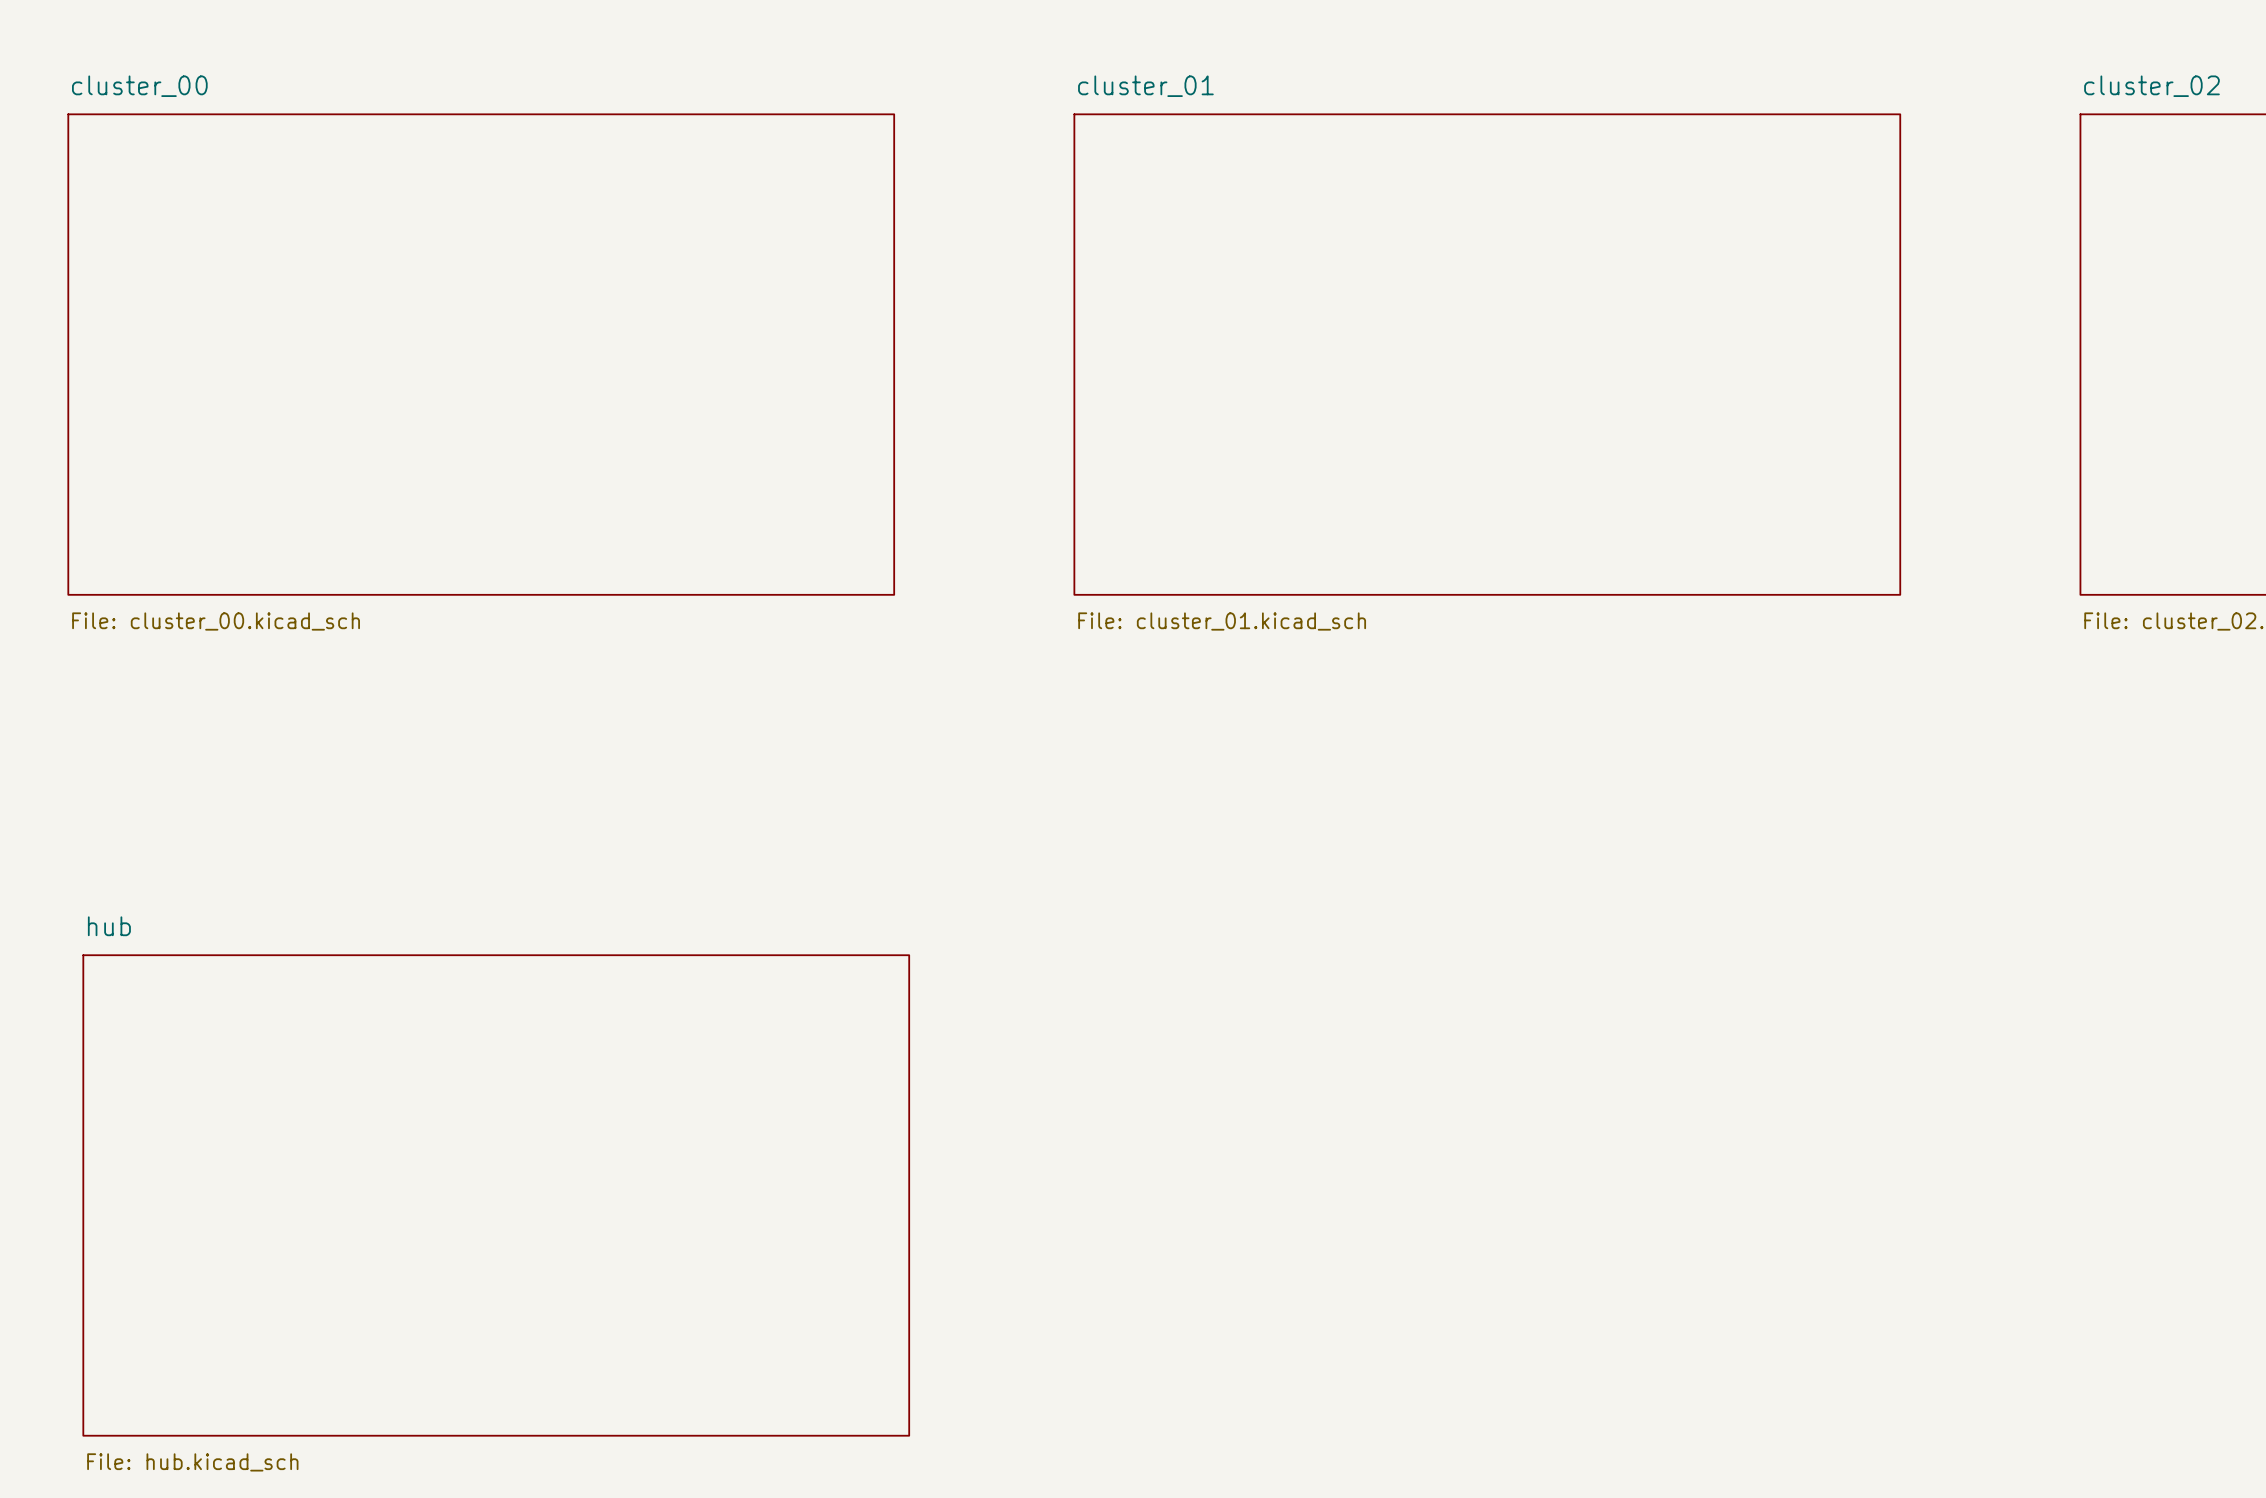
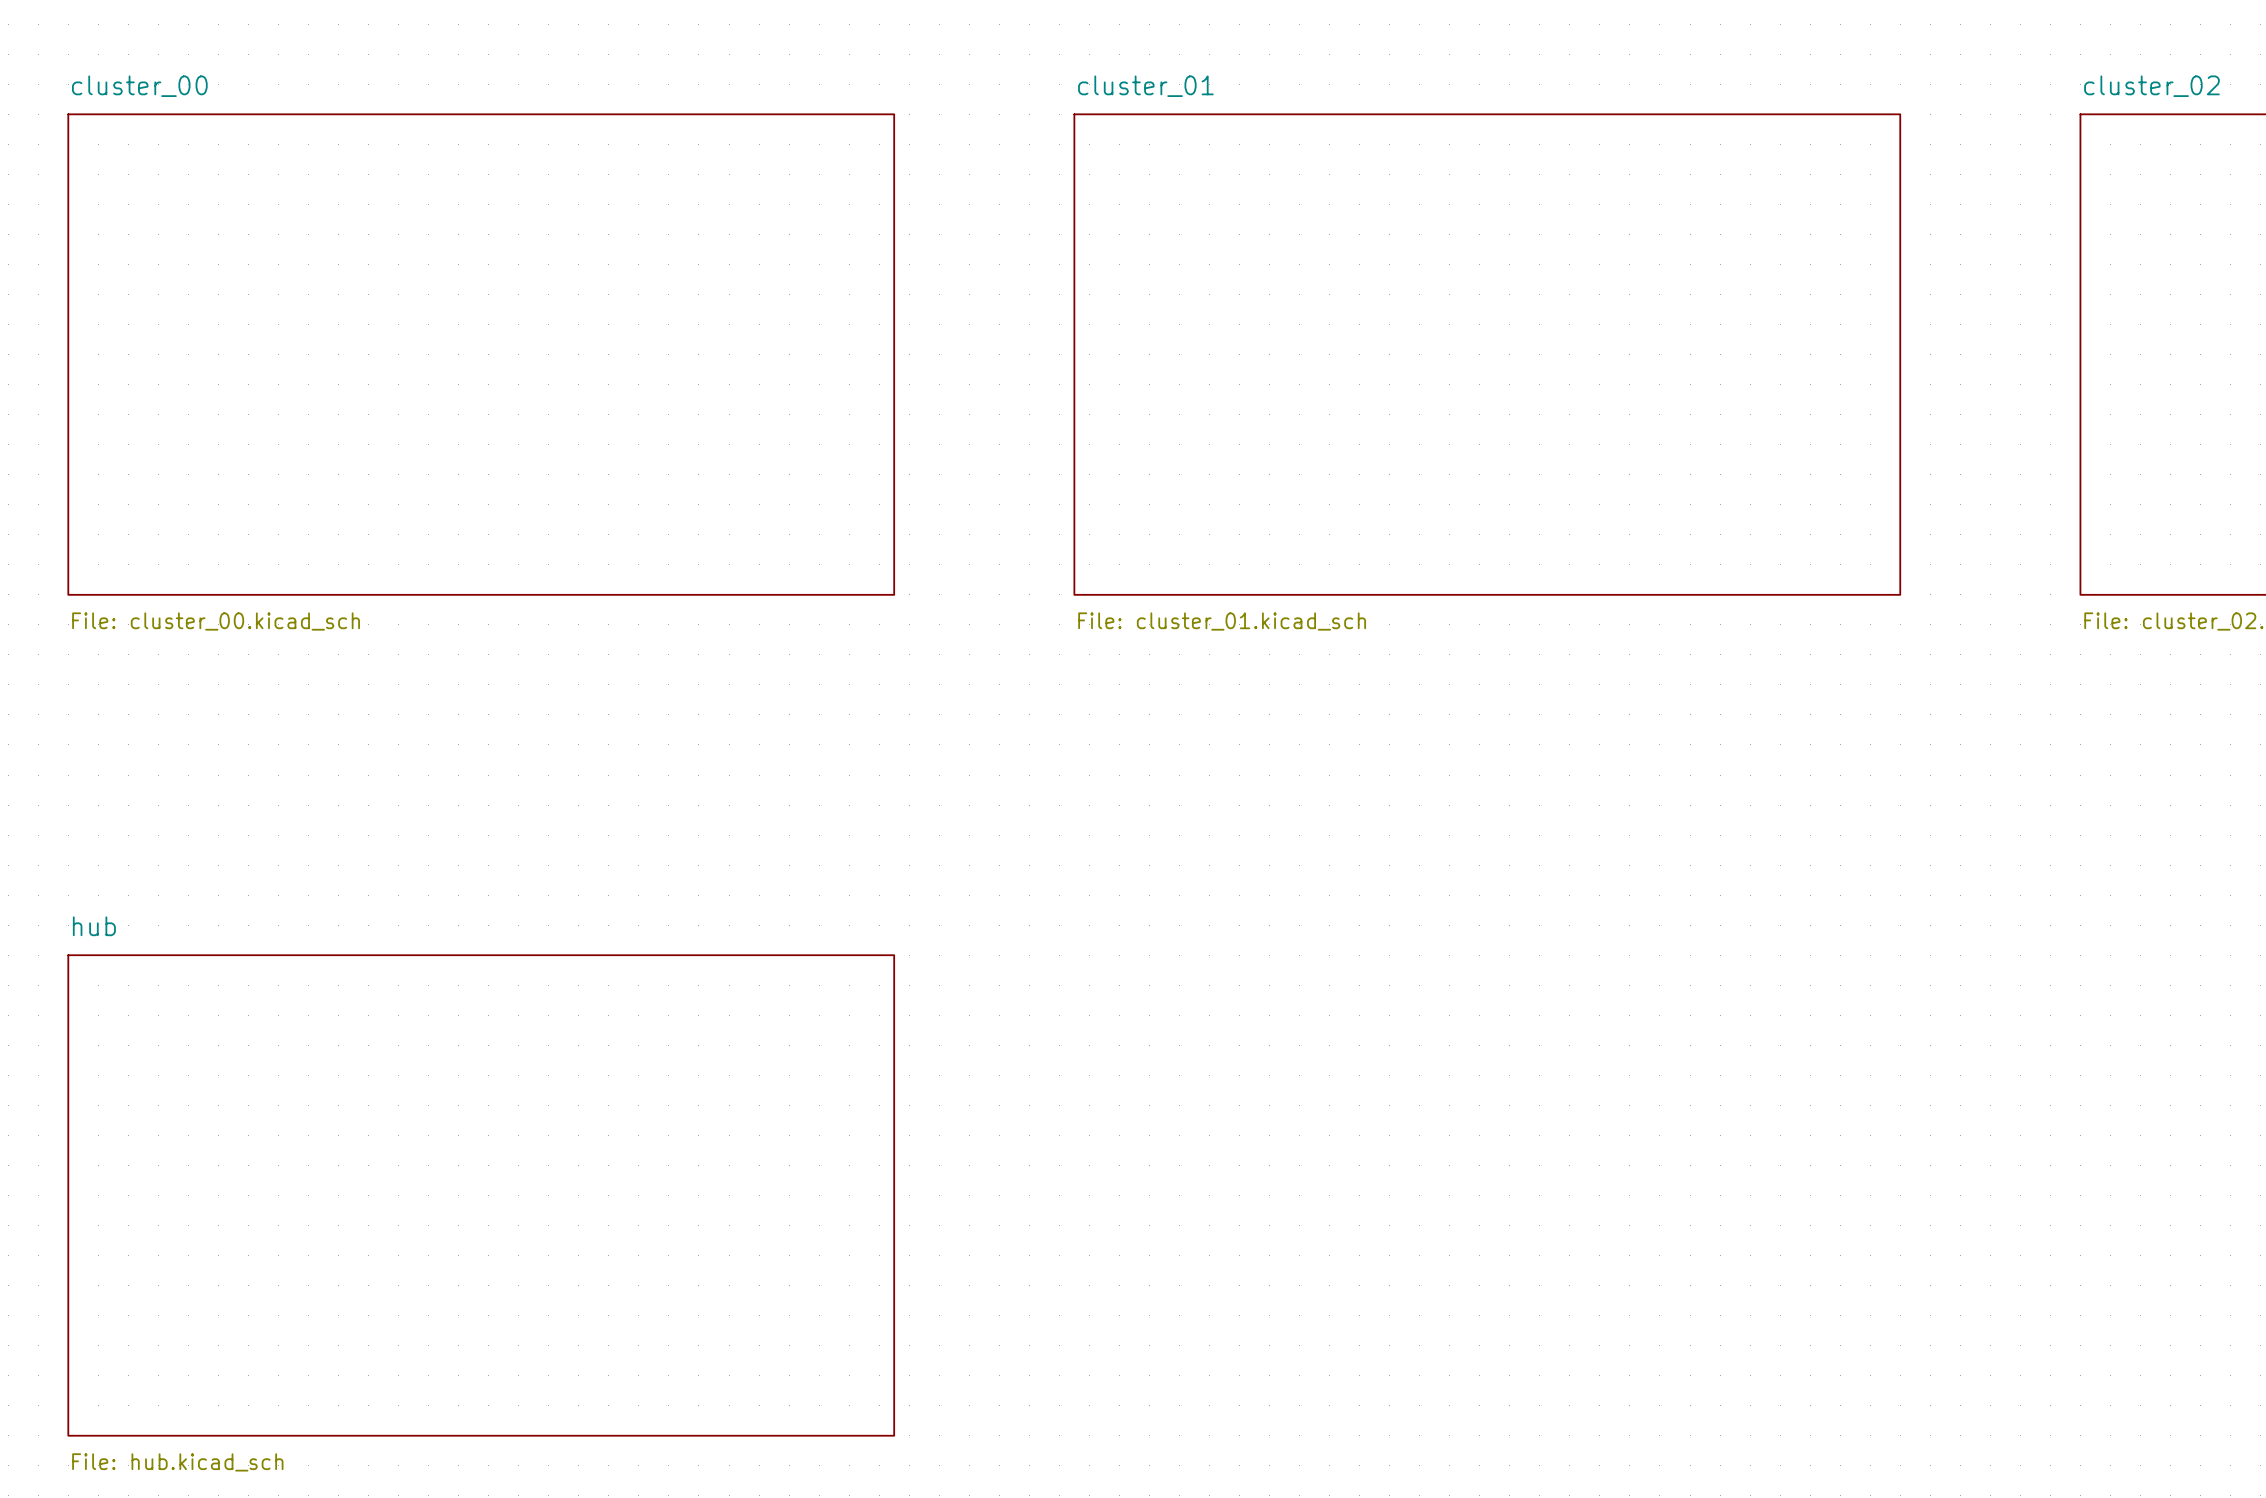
sheet hub position: (496, 1195) -> (481, 1195)

